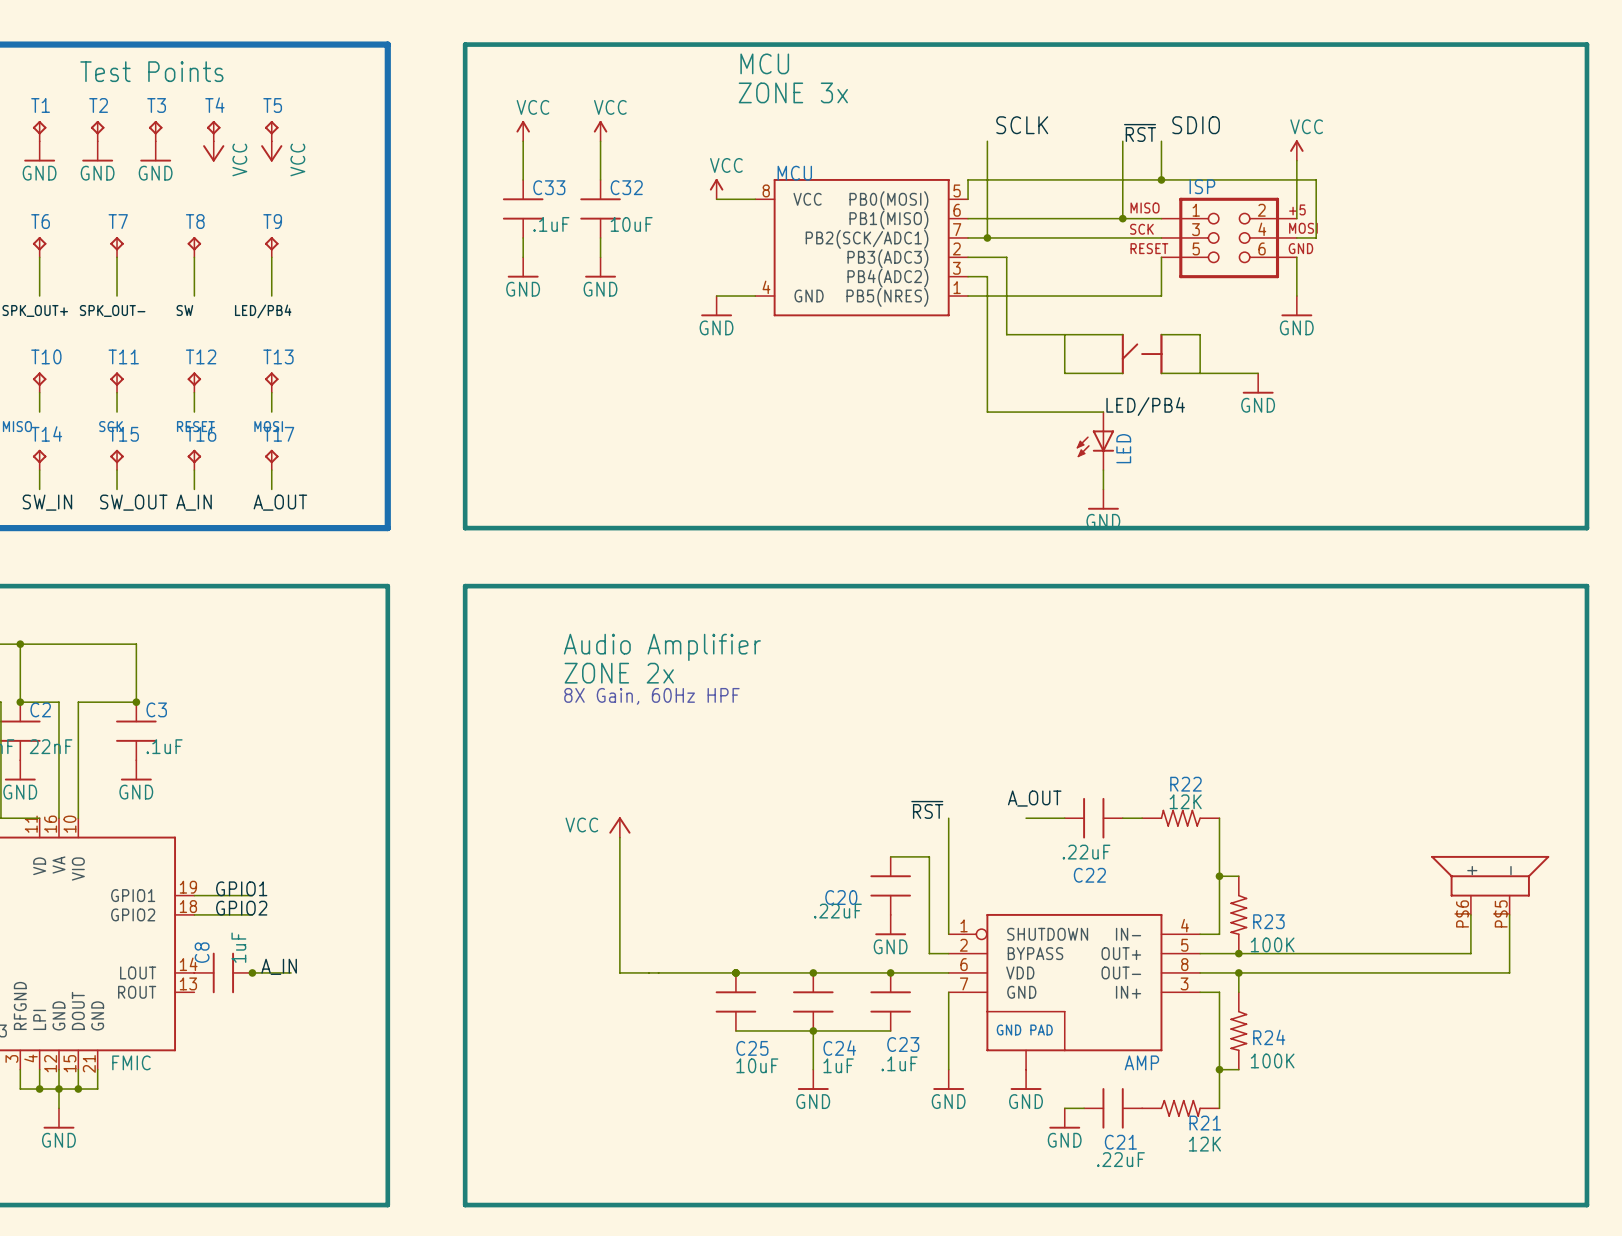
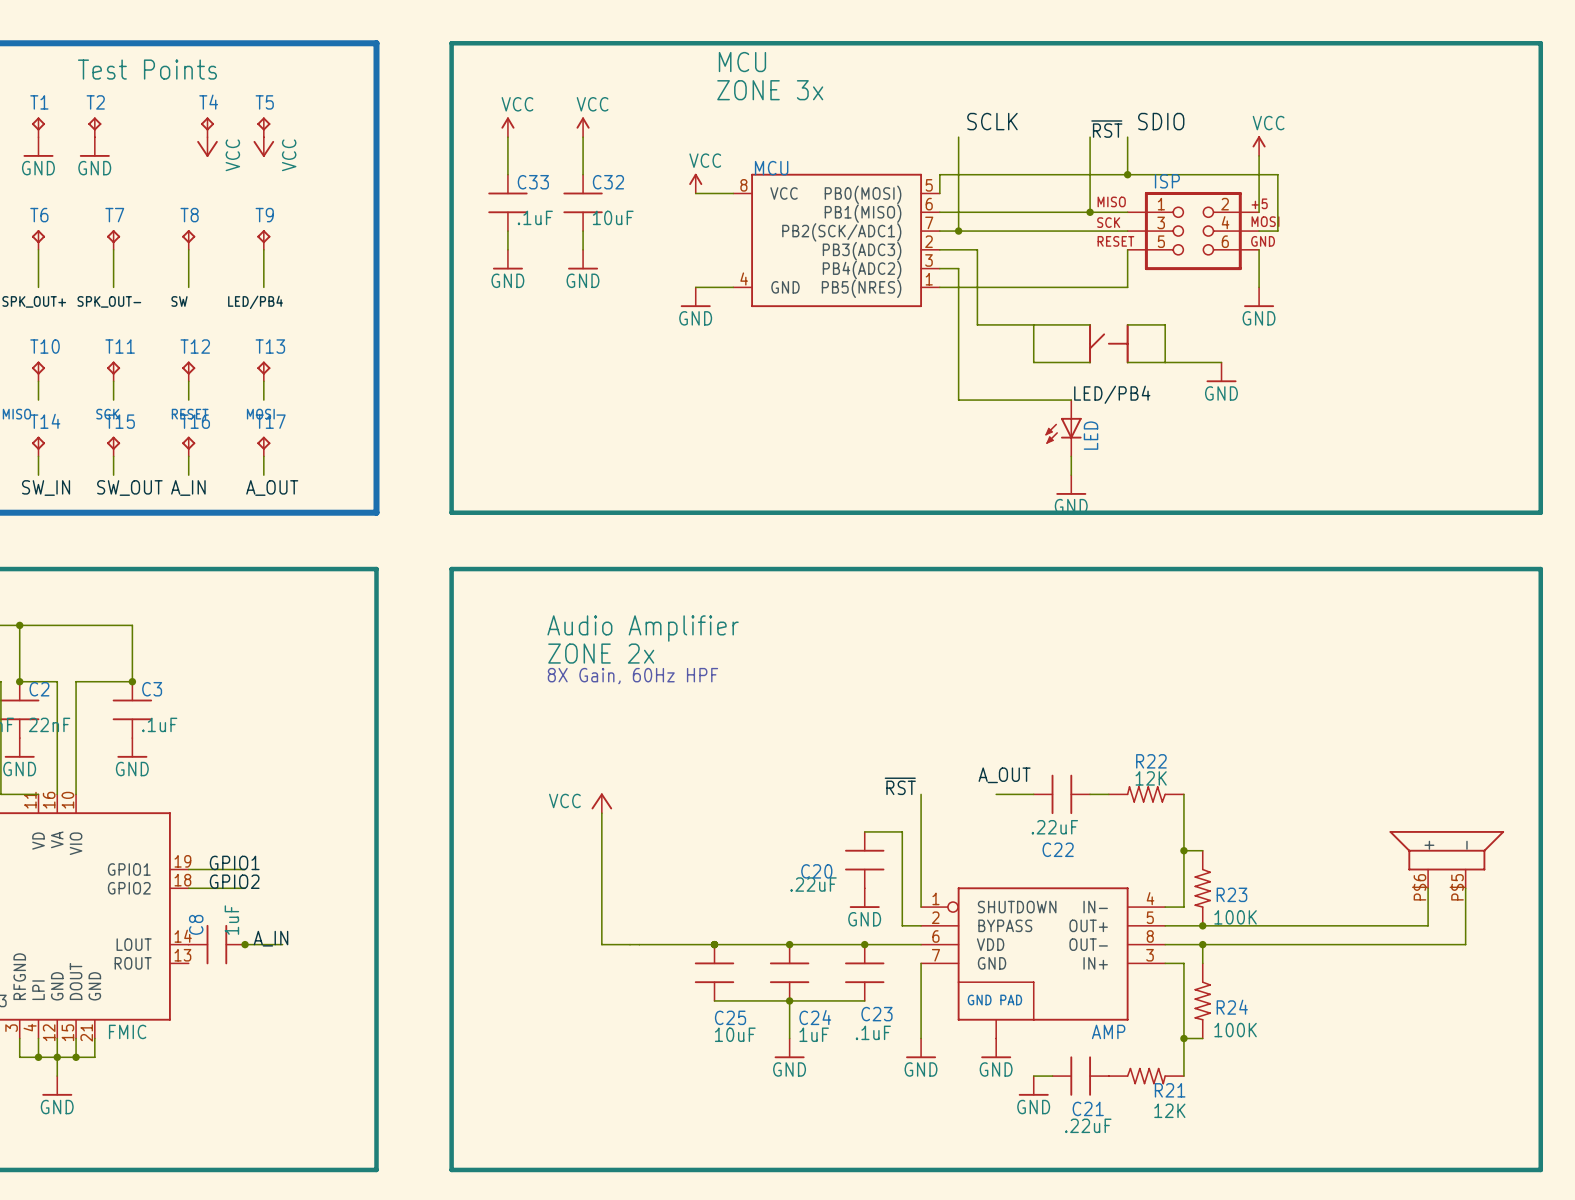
T3: (155, 131) -> none
power symbol: GND (155, 151) -> none

